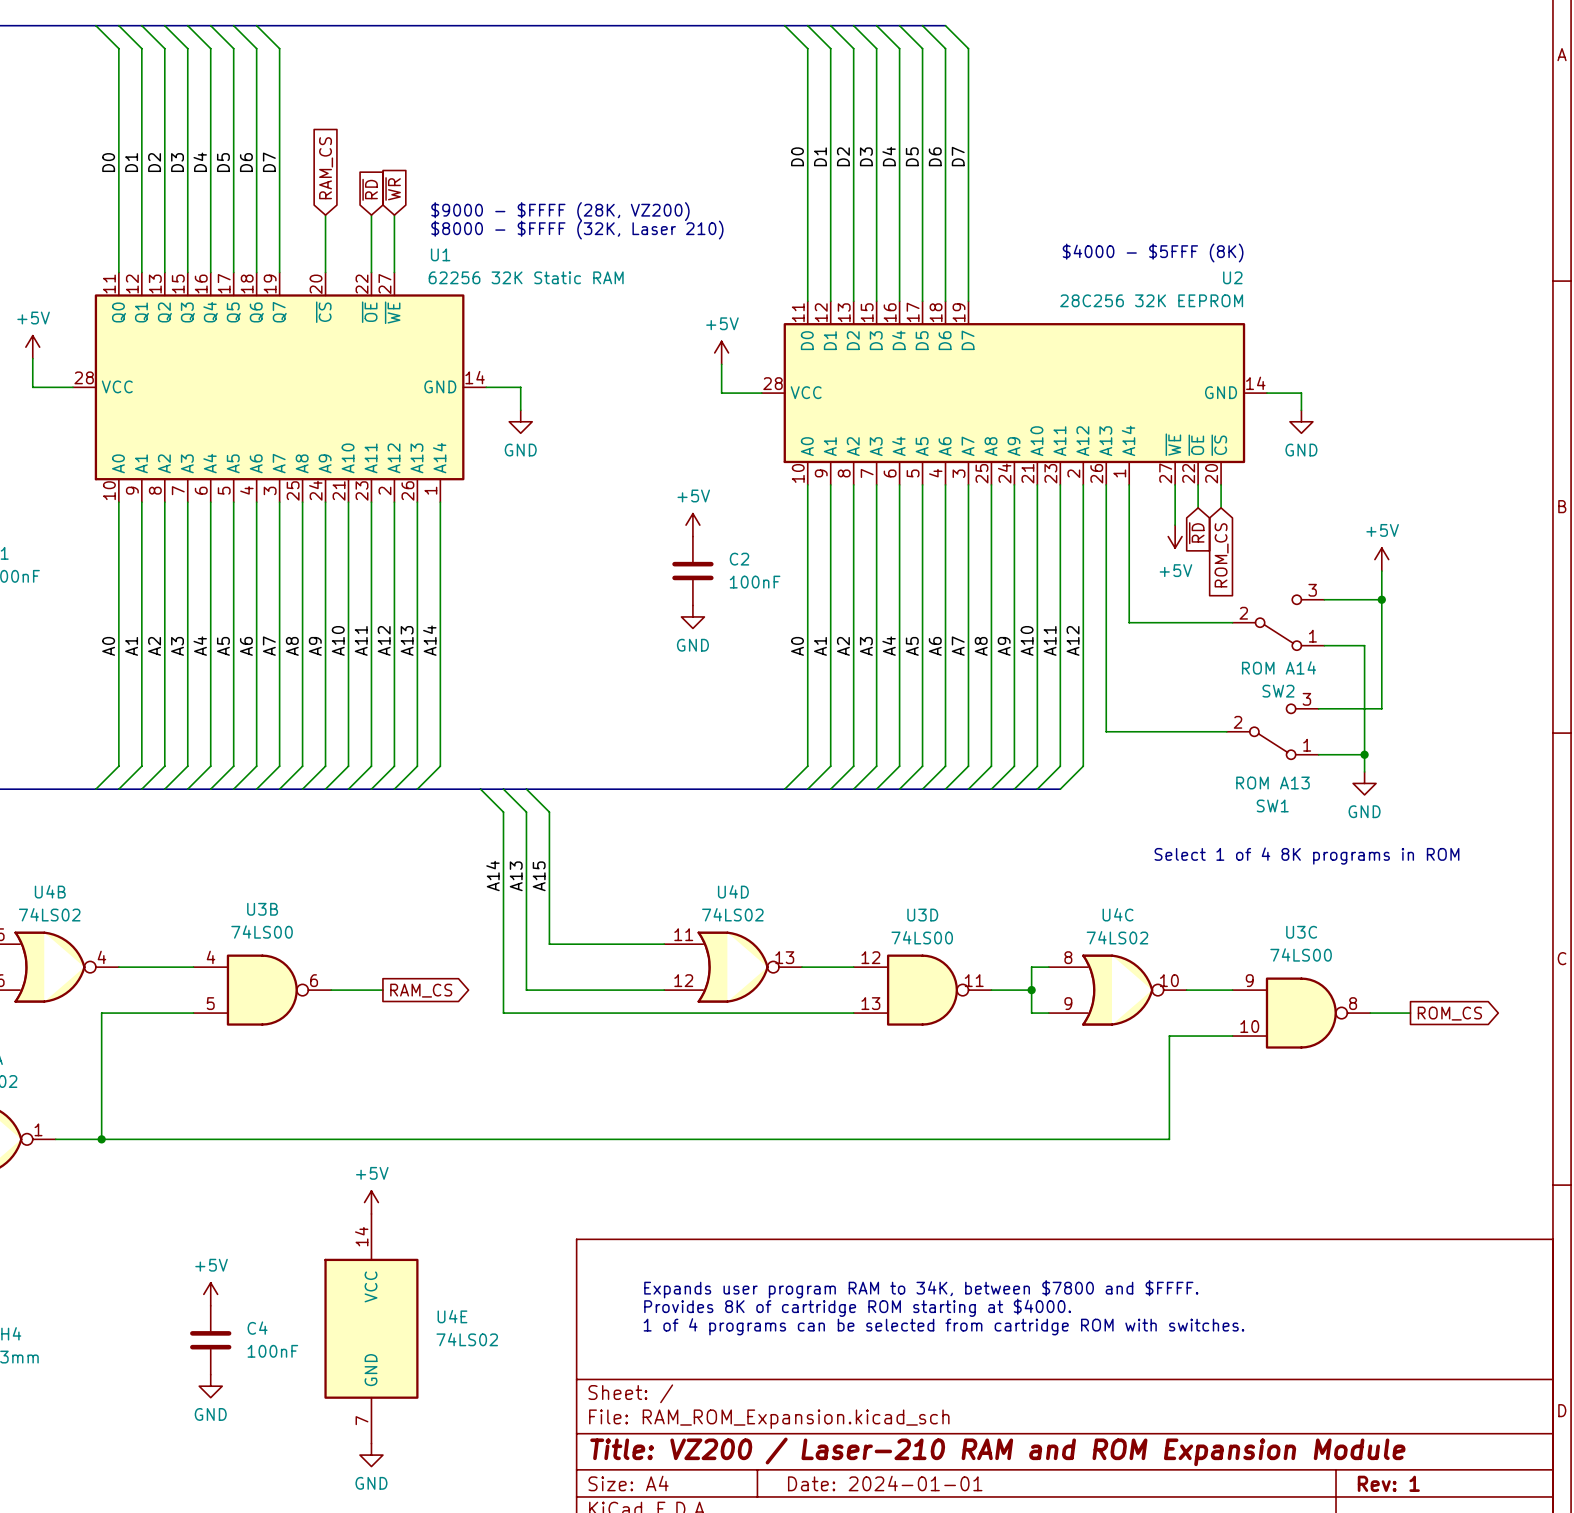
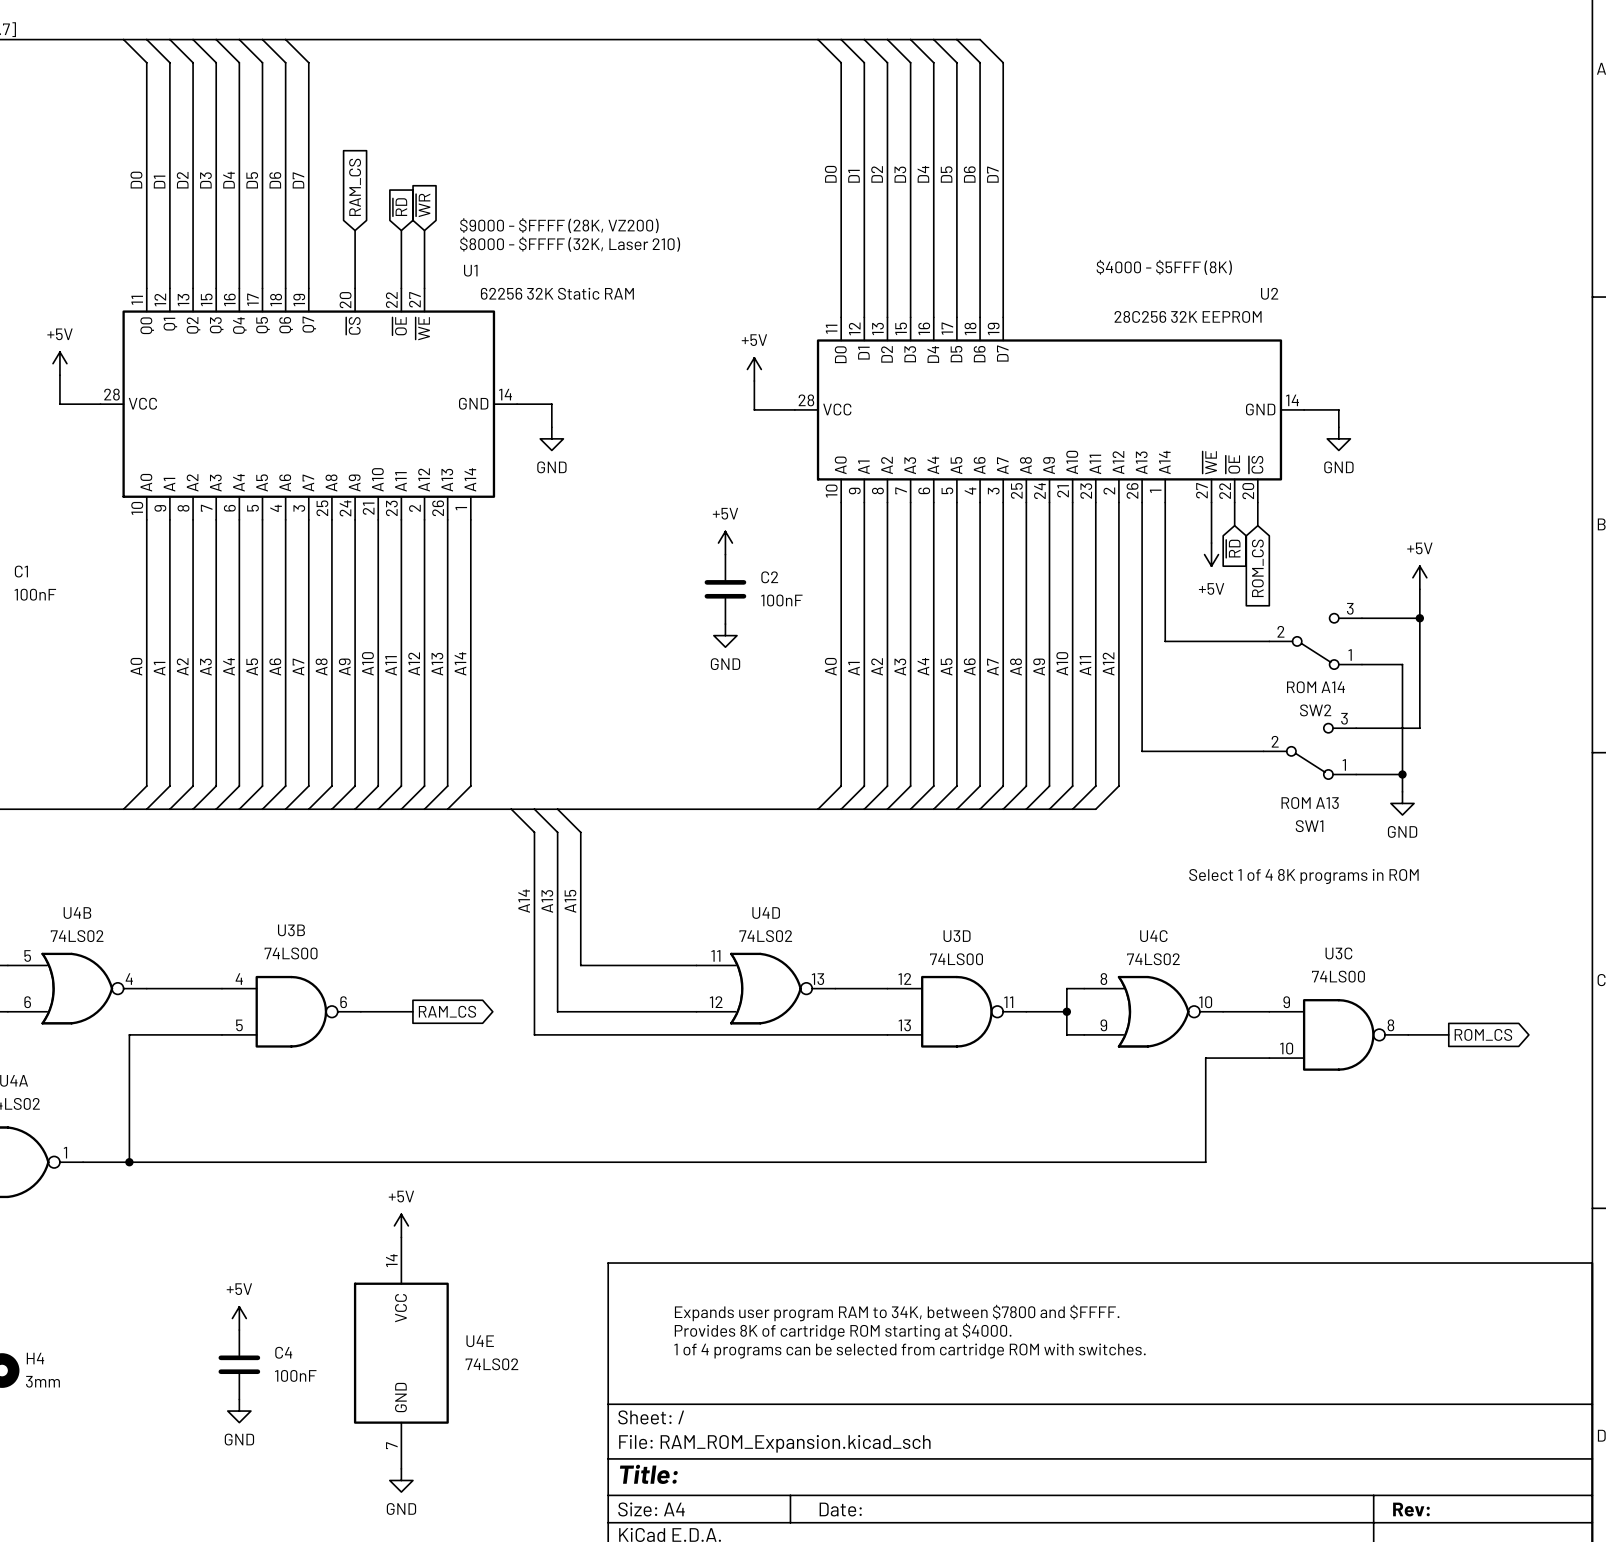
title block: Title: VZ200 / Laser-210 RAM and ROM Expansion Module (997, 1451) -> Title: (648, 1474)
title block: Date: 2024-01-01 (885, 1483) -> Date: (840, 1509)
title block: Rev: 1 (1388, 1483) -> Rev: (1411, 1509)

